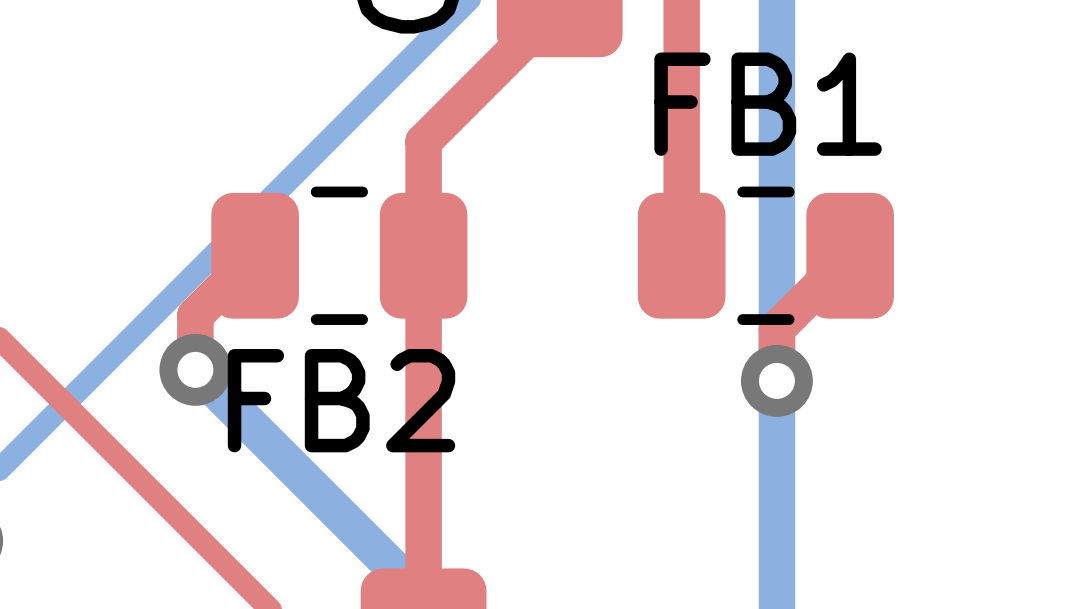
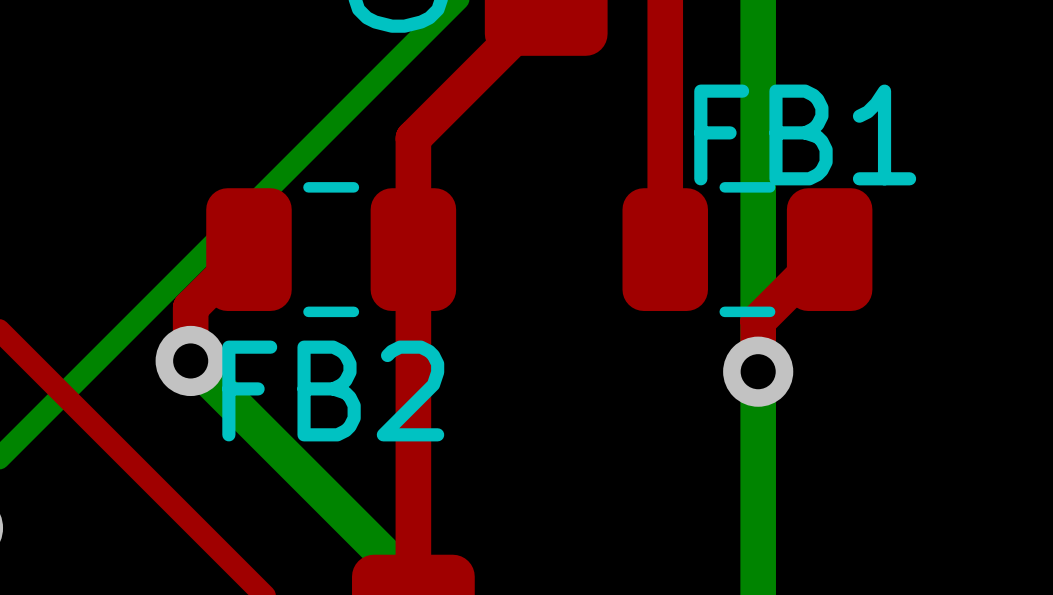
FB1 name position: FB1 (768, 104) -> FB1 (805, 134)

